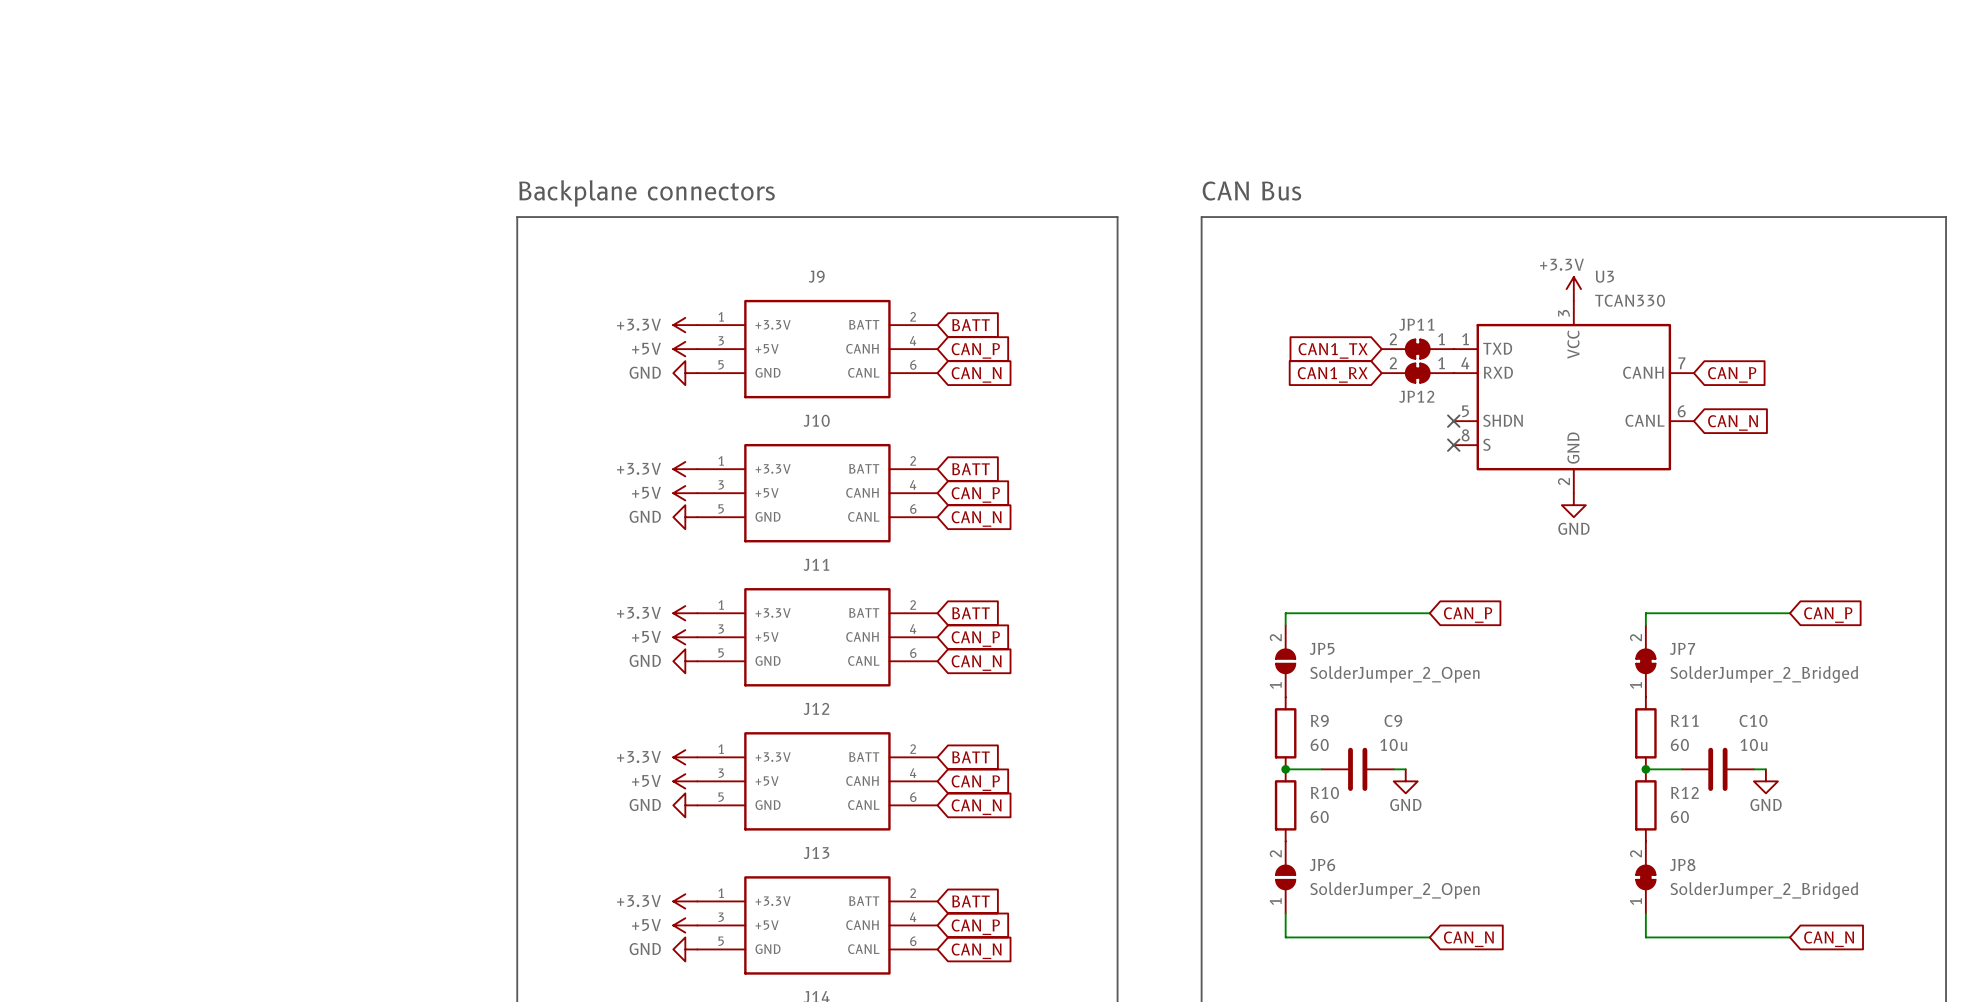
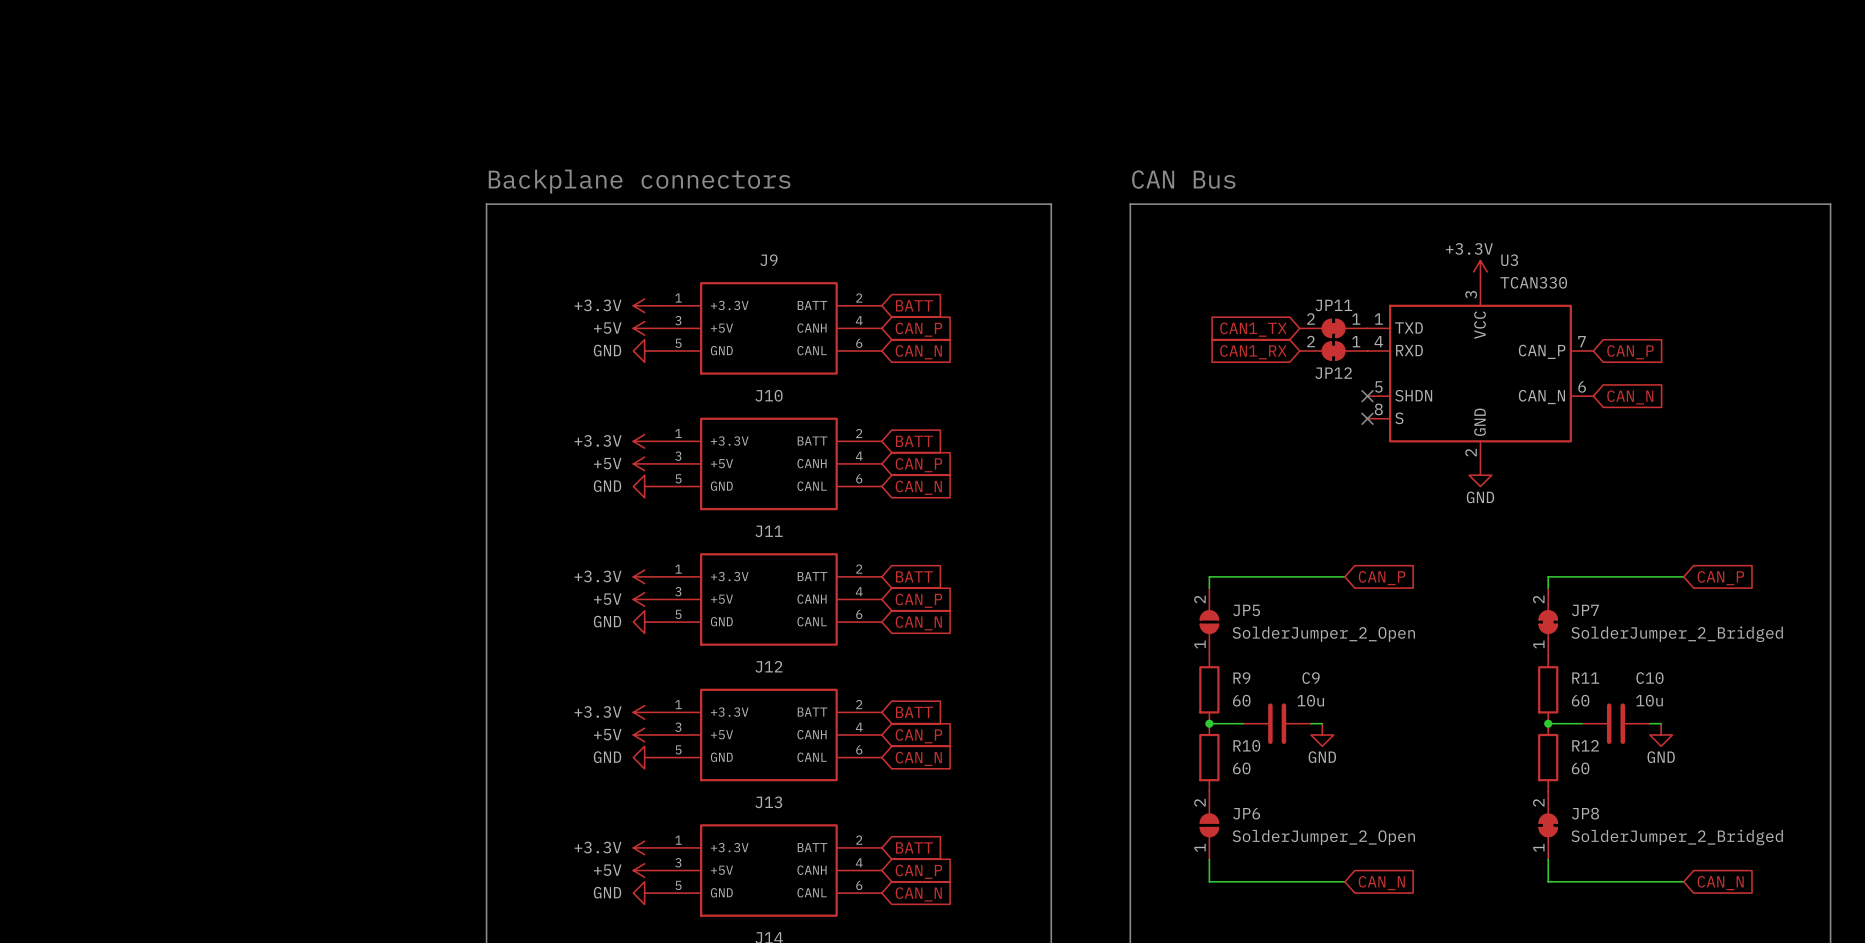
U3 pin name: CANH (1643, 372) -> CAN_P (1542, 351)
U3 pin name: CANL (1645, 420) -> CAN_N (1541, 397)

